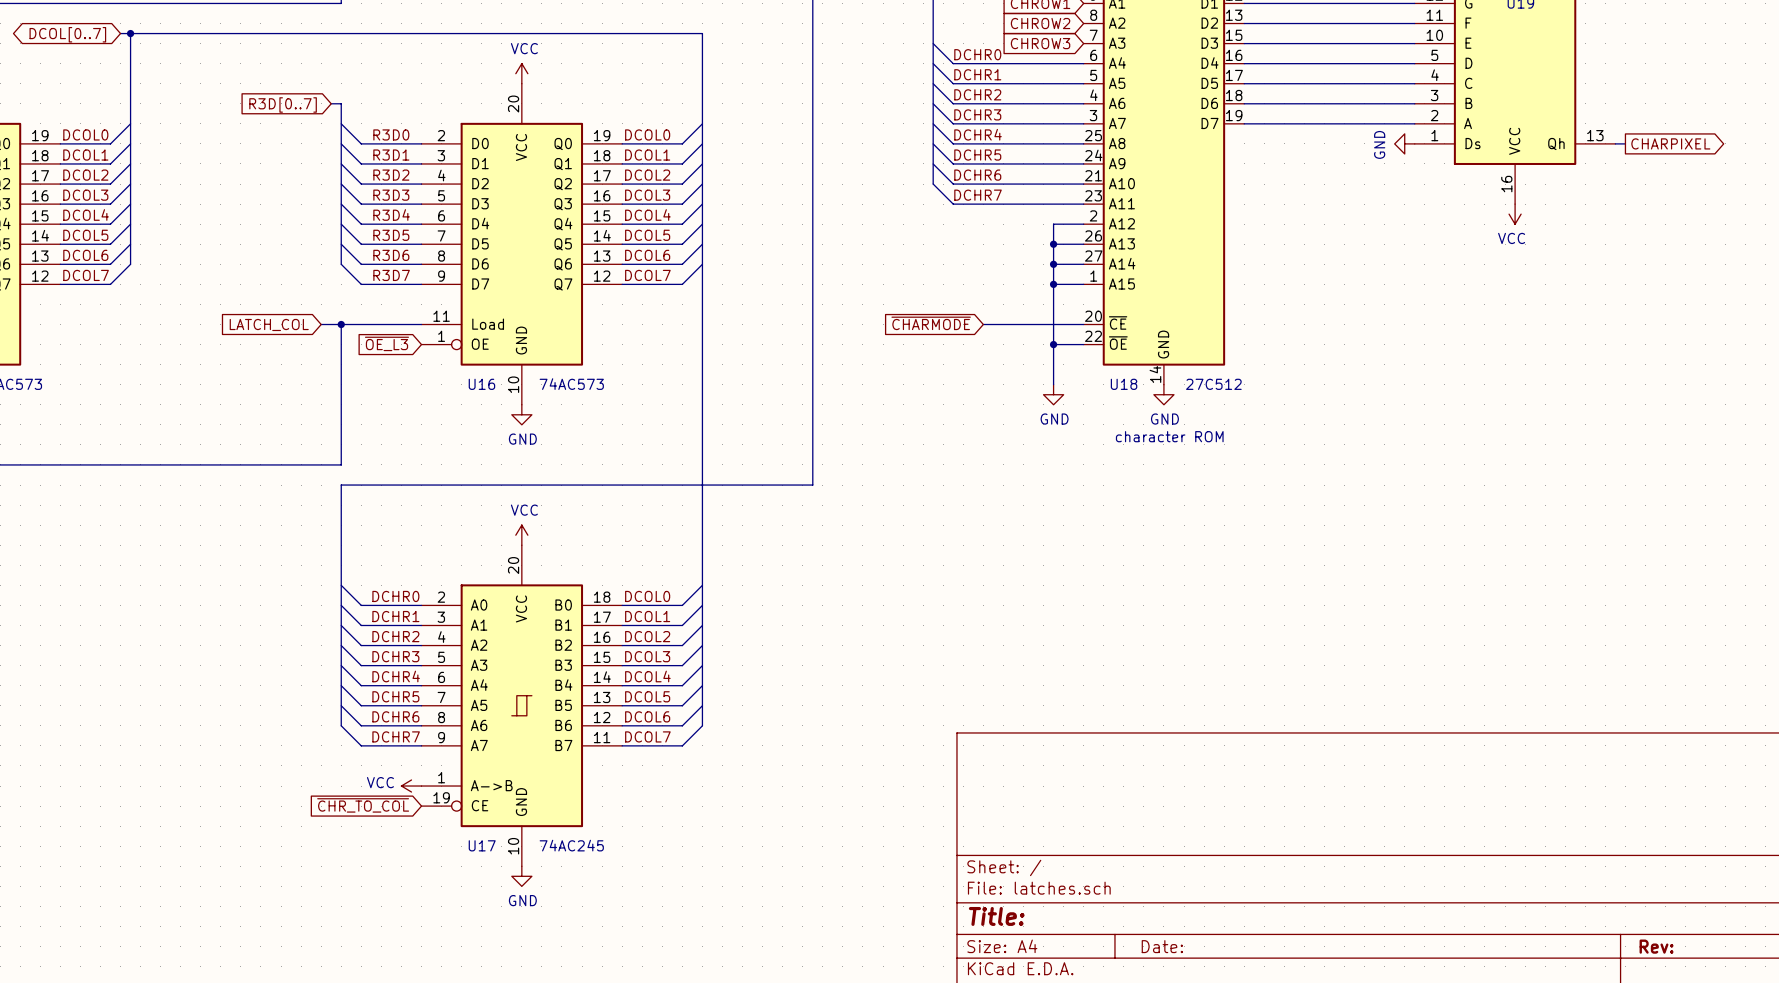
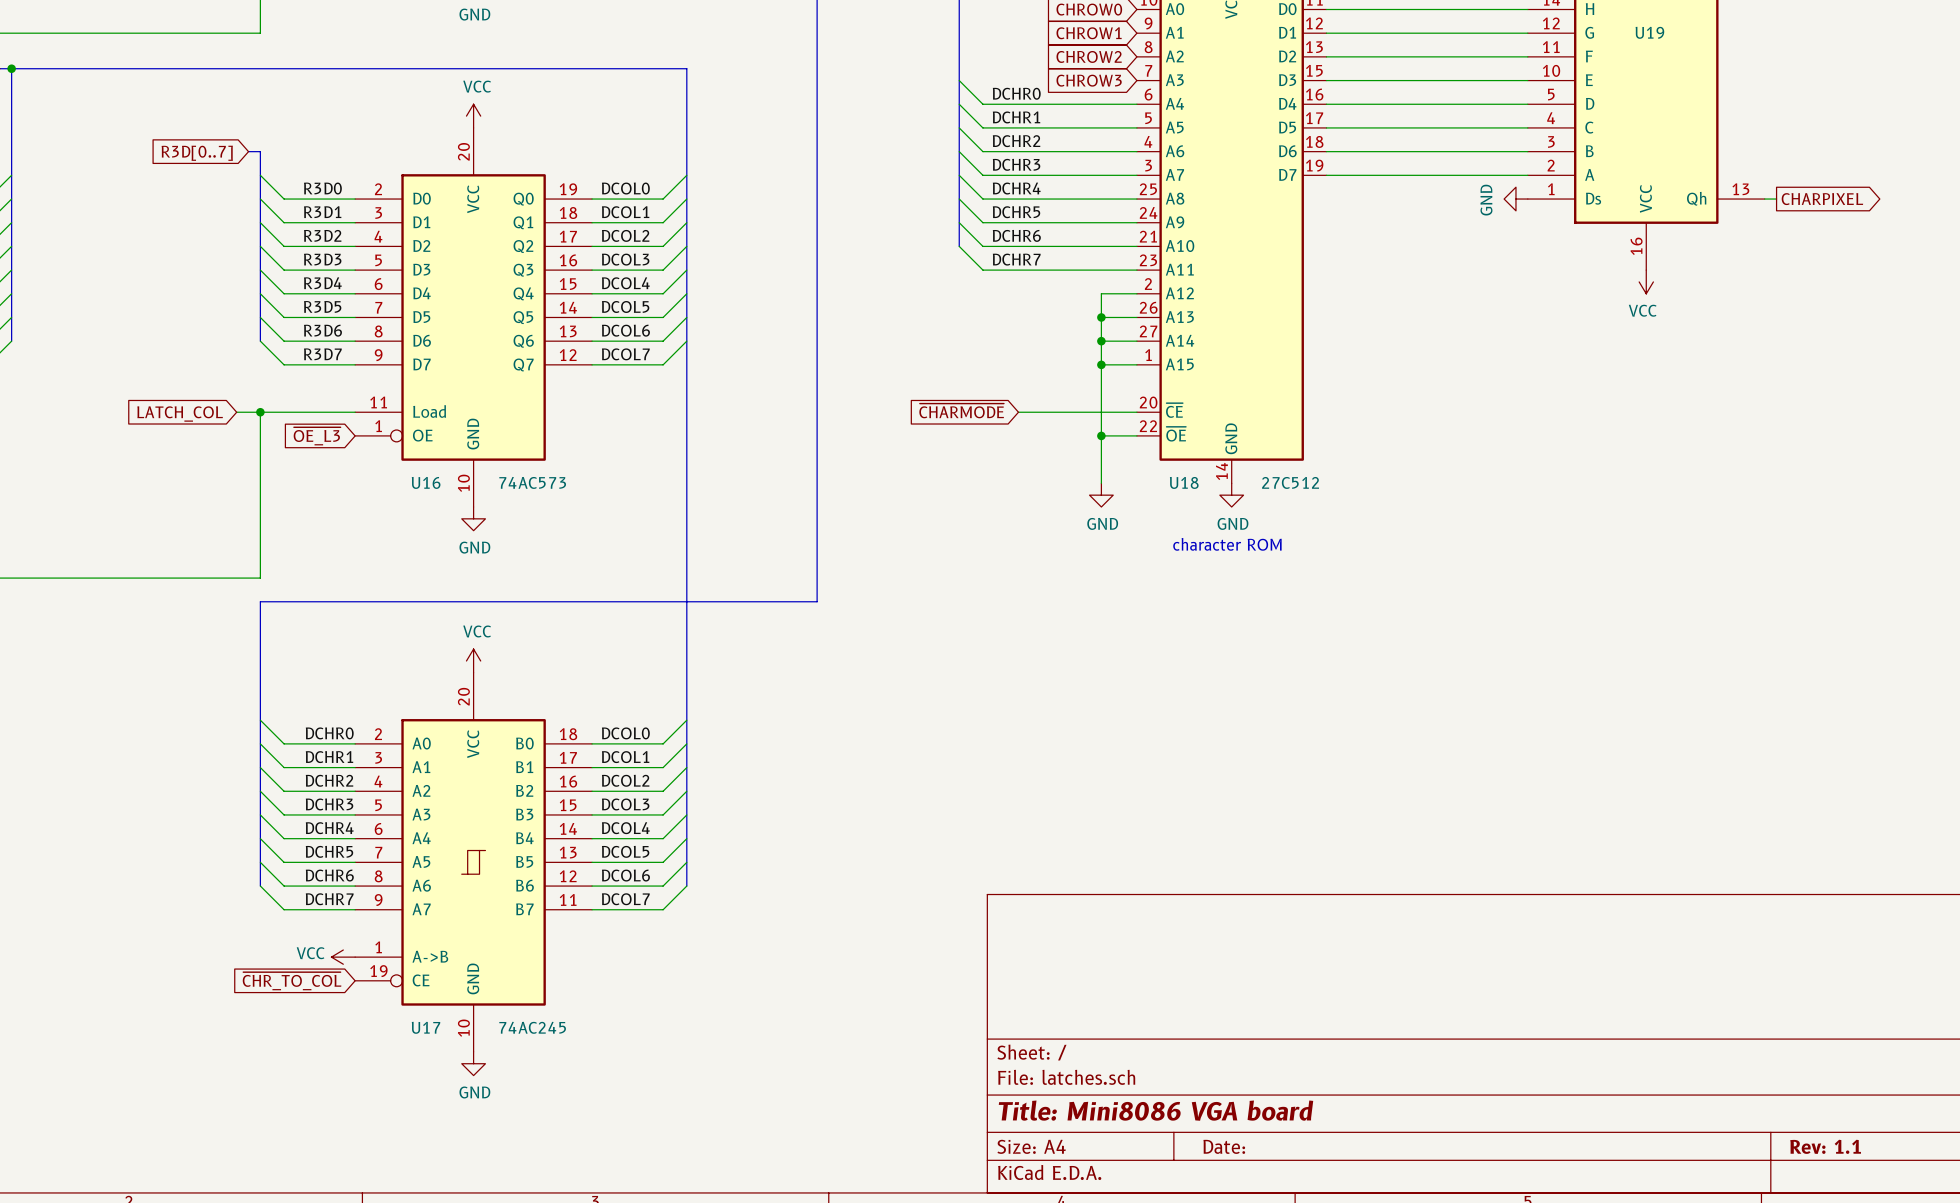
title block: Title: (996, 916) -> Title: Mini8086 VGA board (1156, 1110)
title block: Rev: (1656, 946) -> Rev: 1.1 (1825, 1146)

